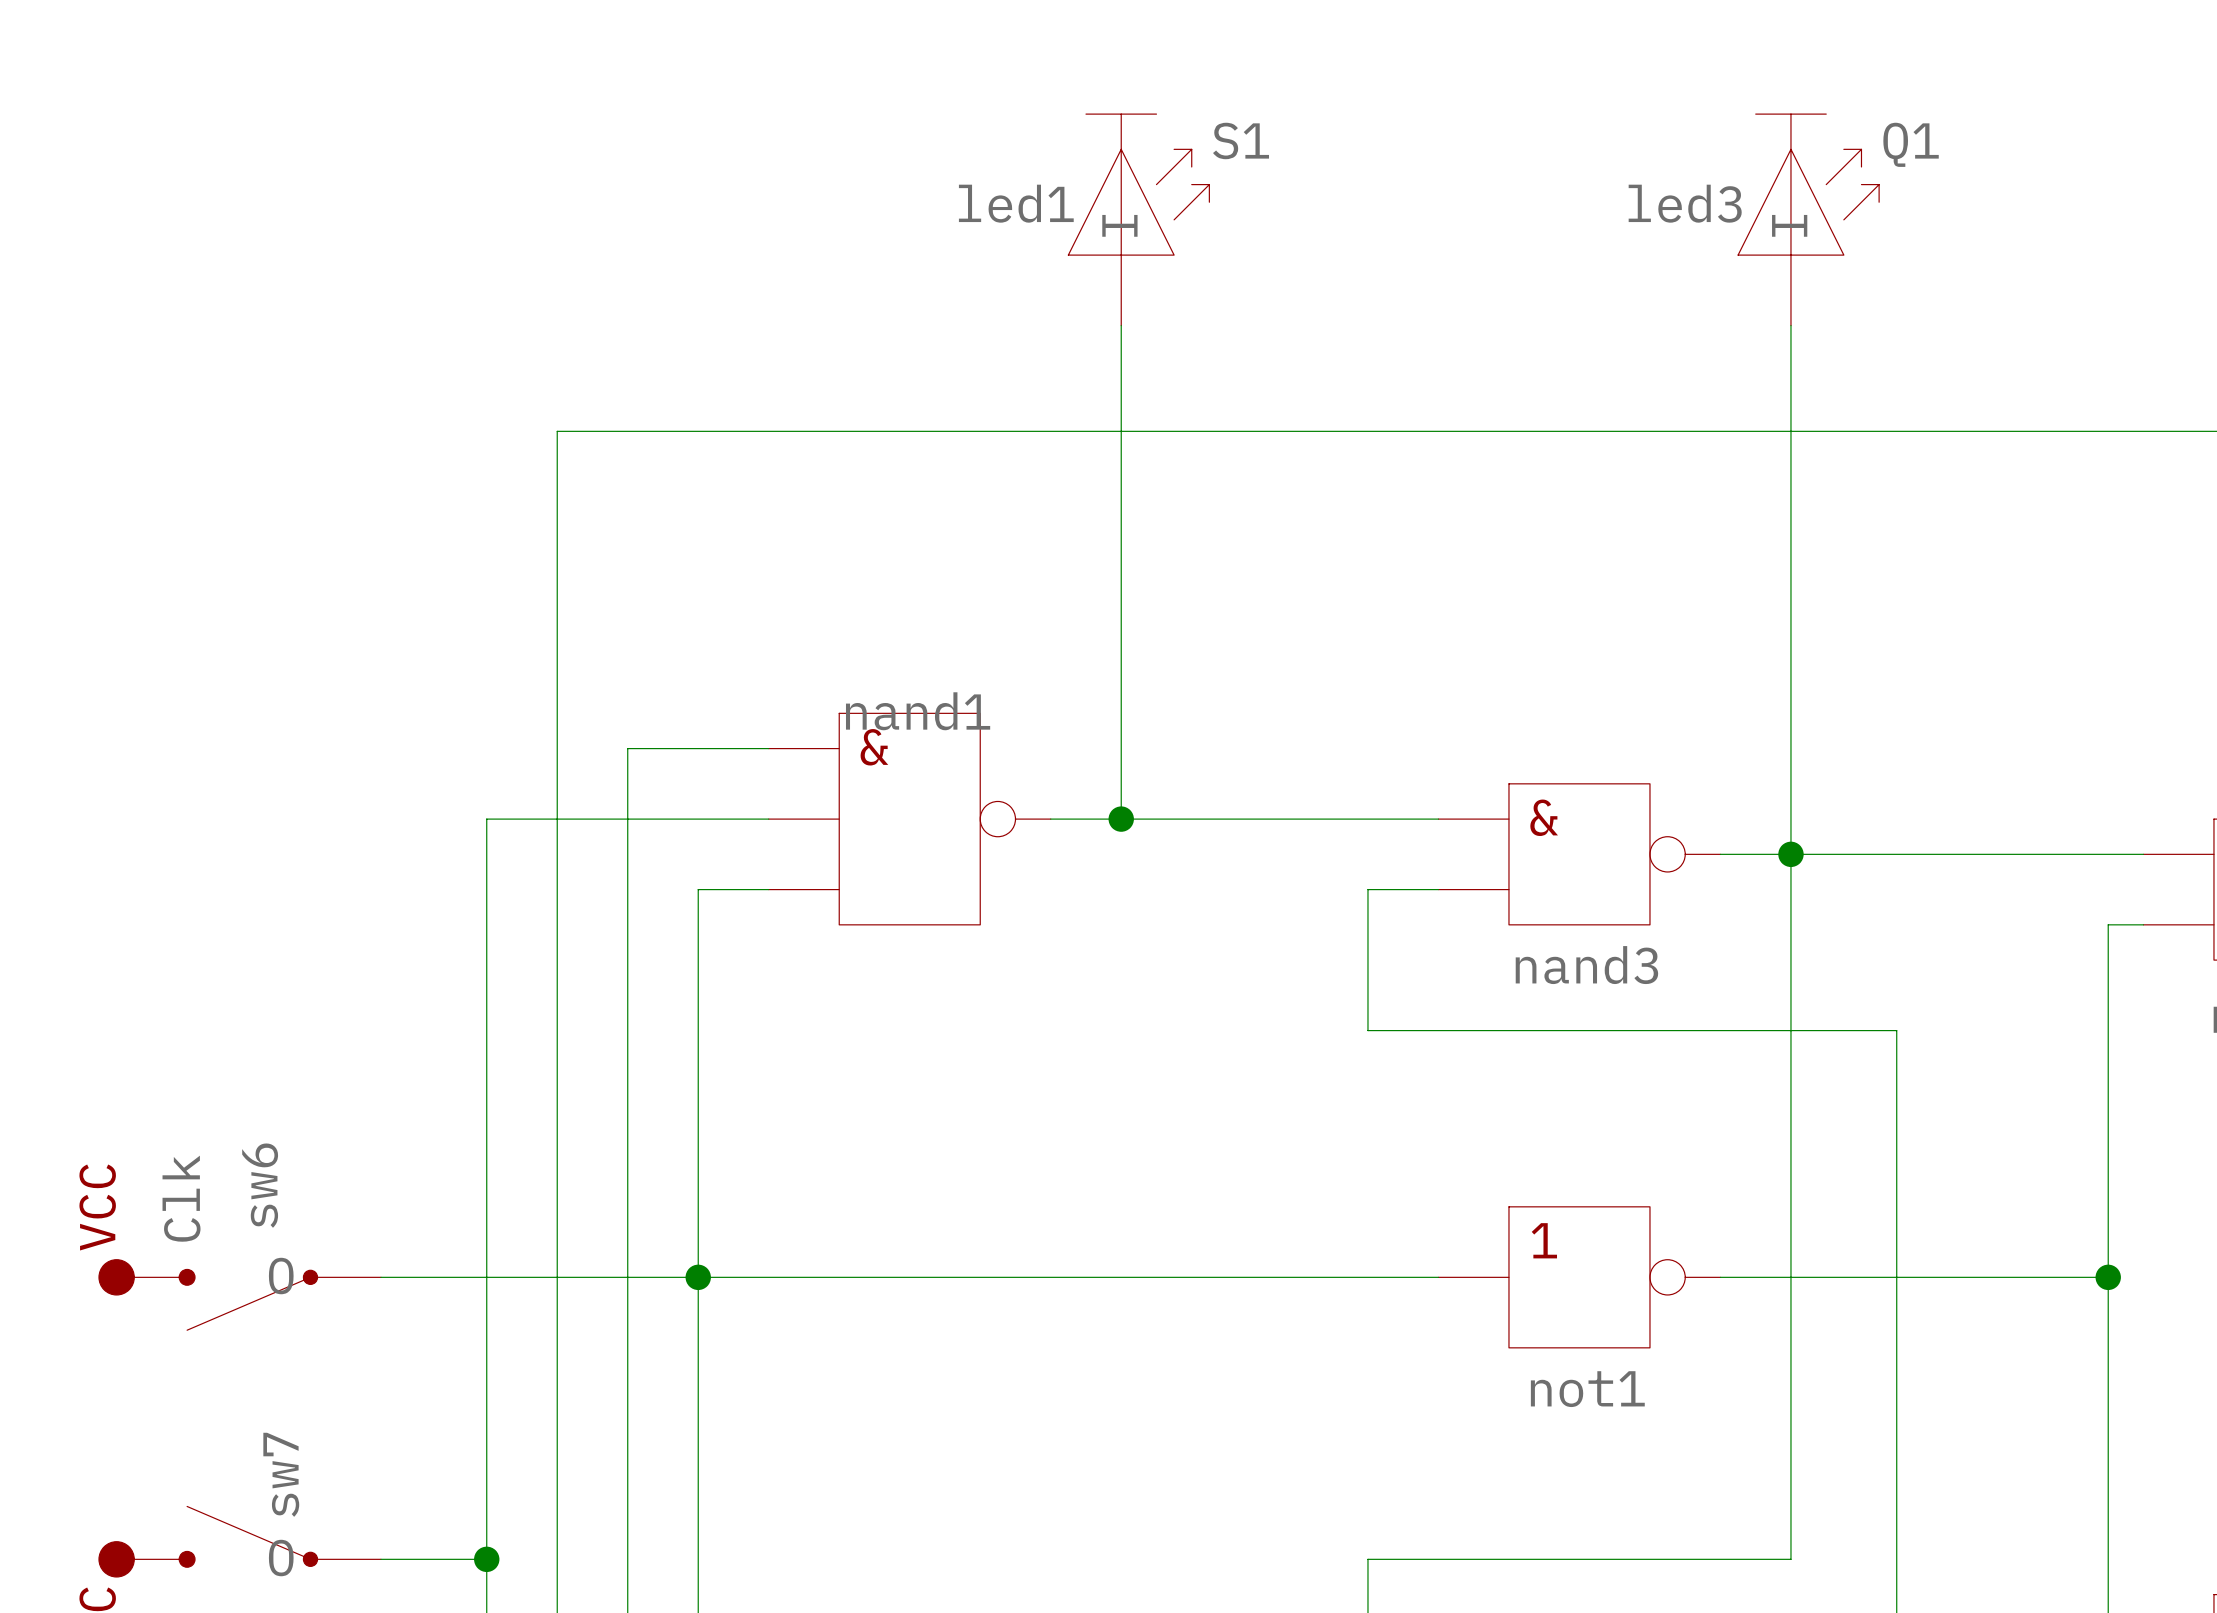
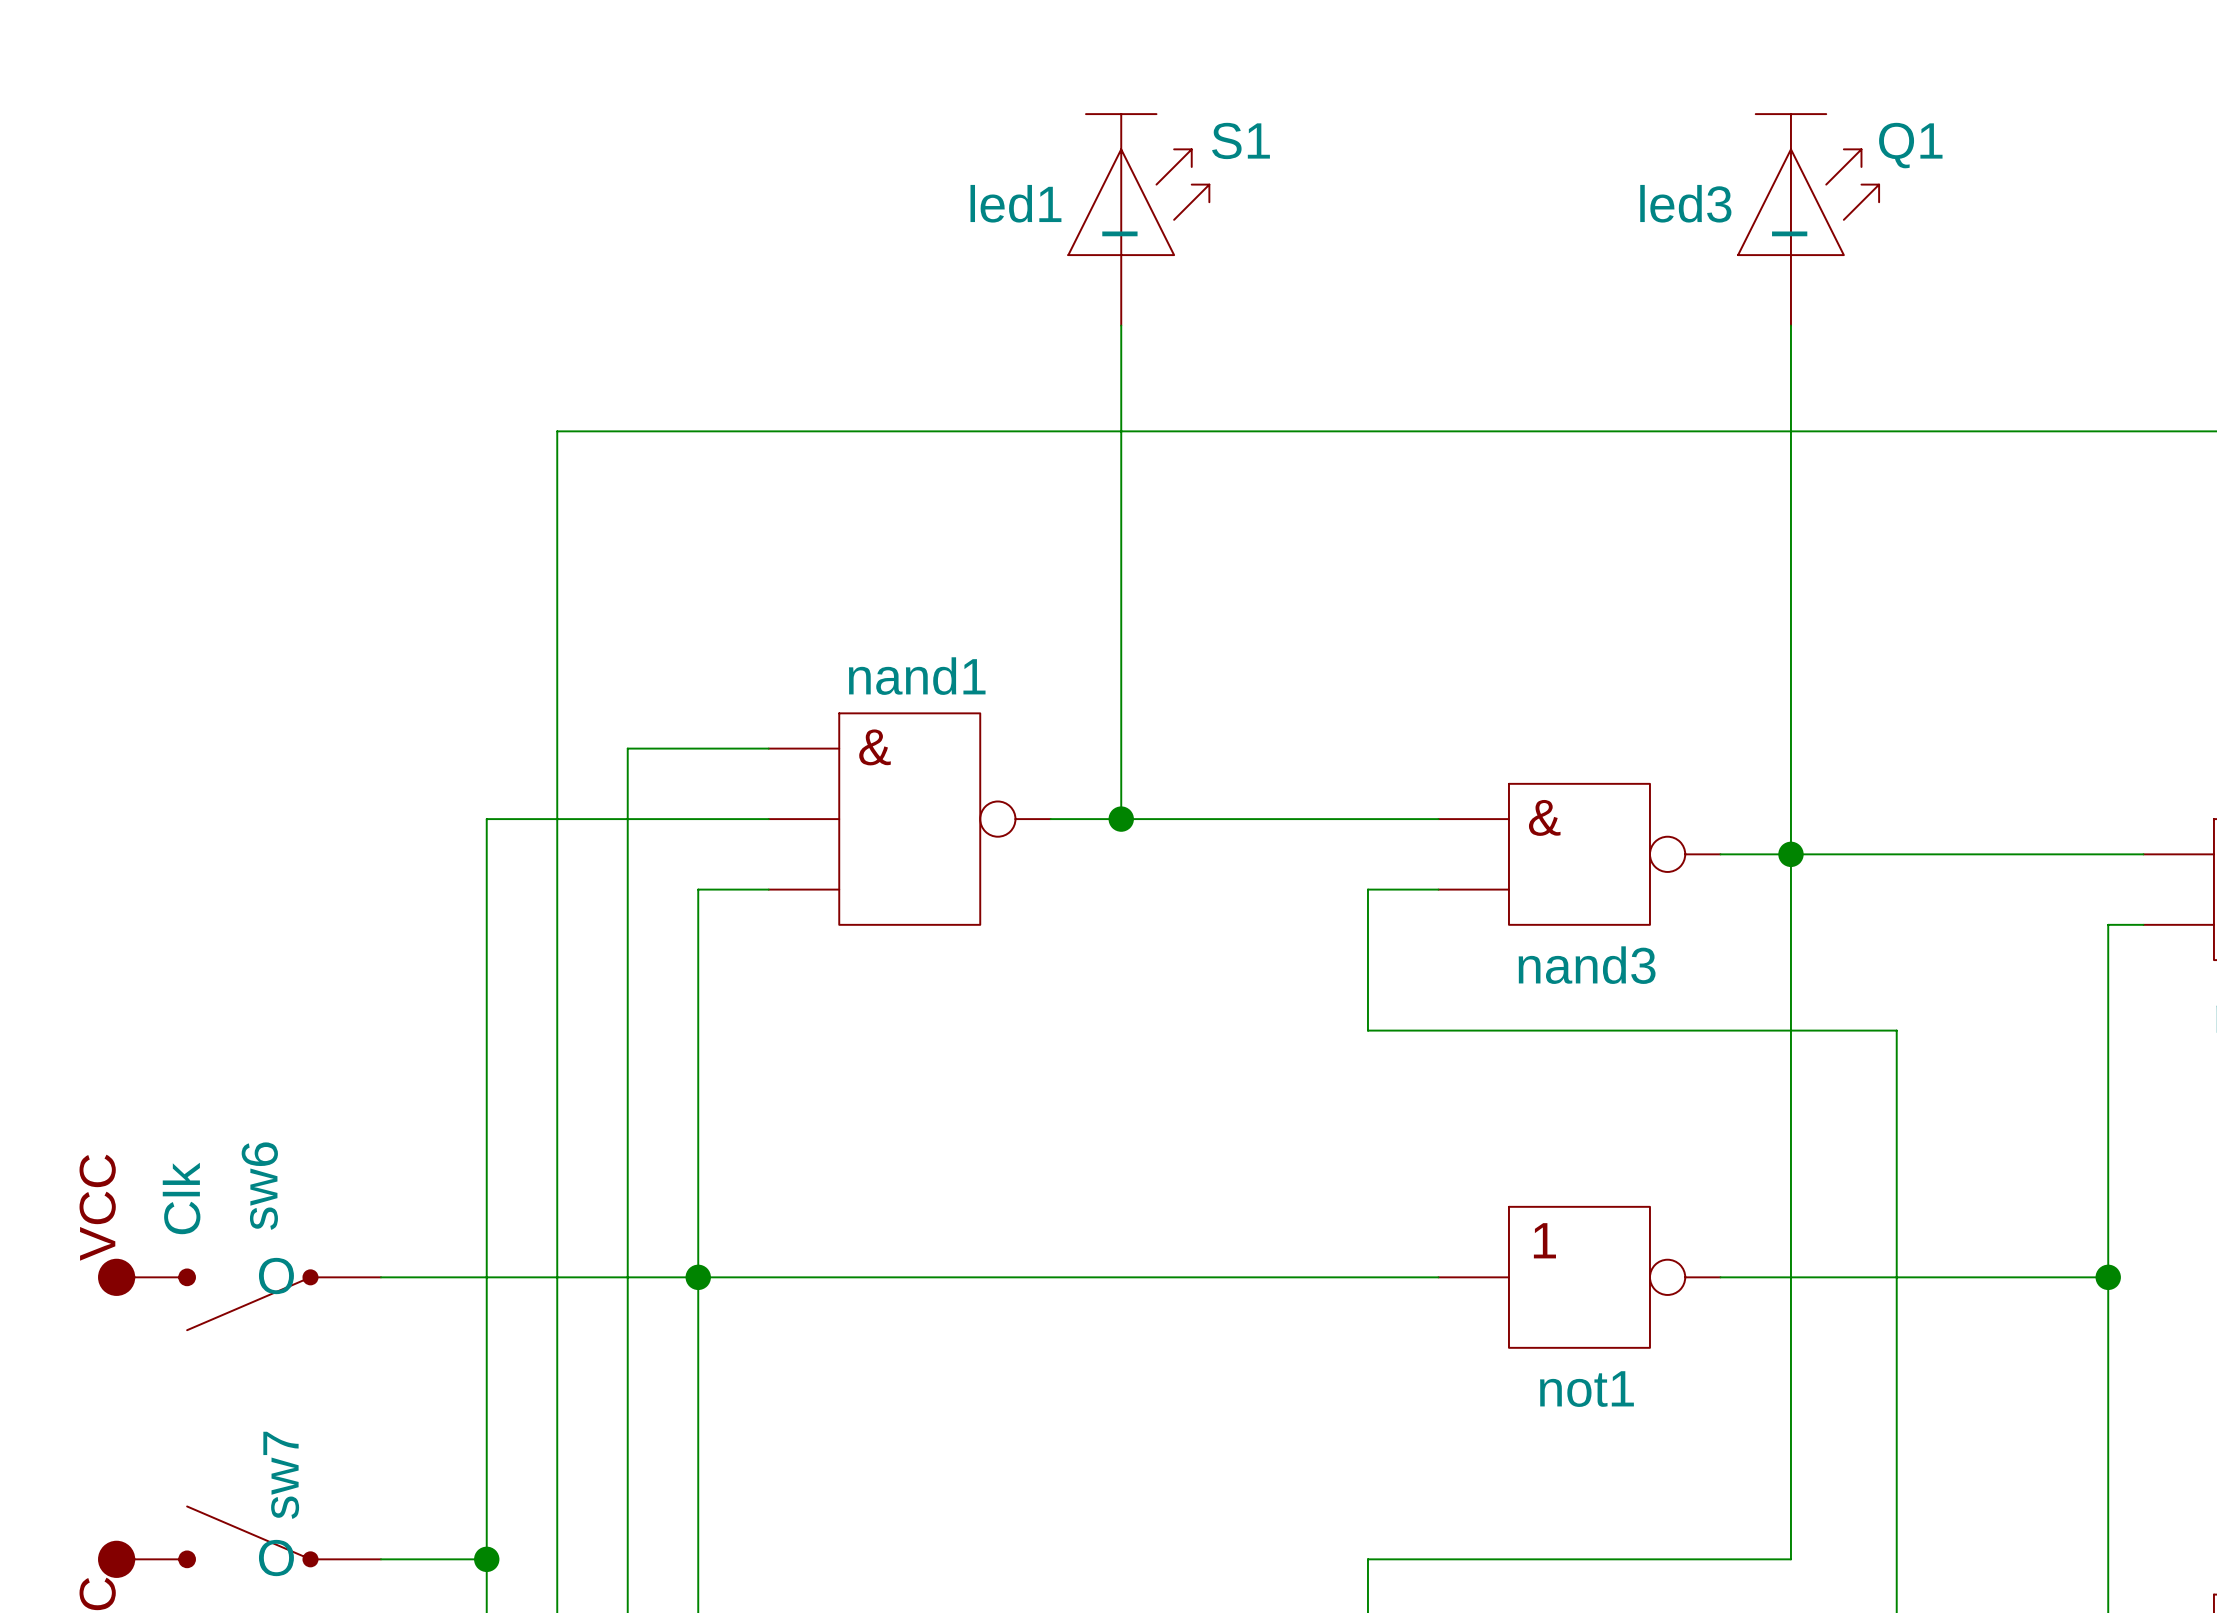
nand1 name position: nand1 (918, 711) -> nand1 (917, 676)

